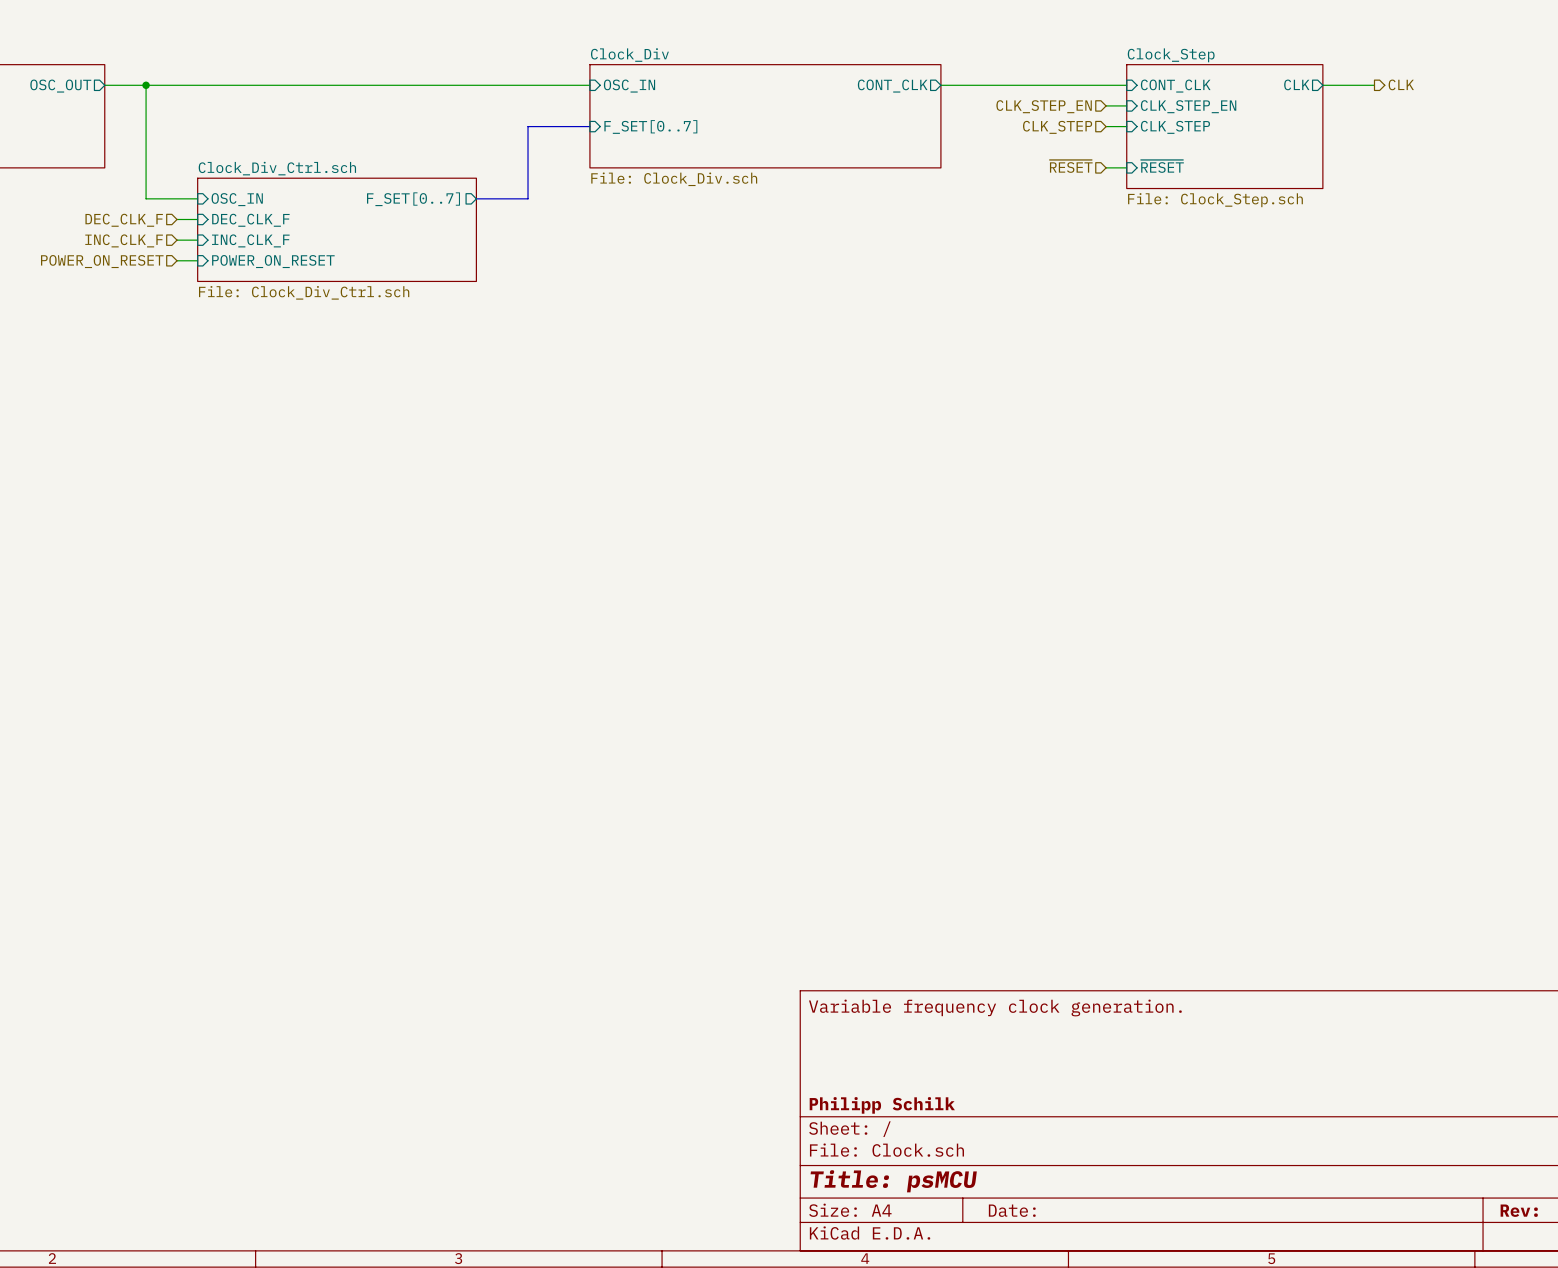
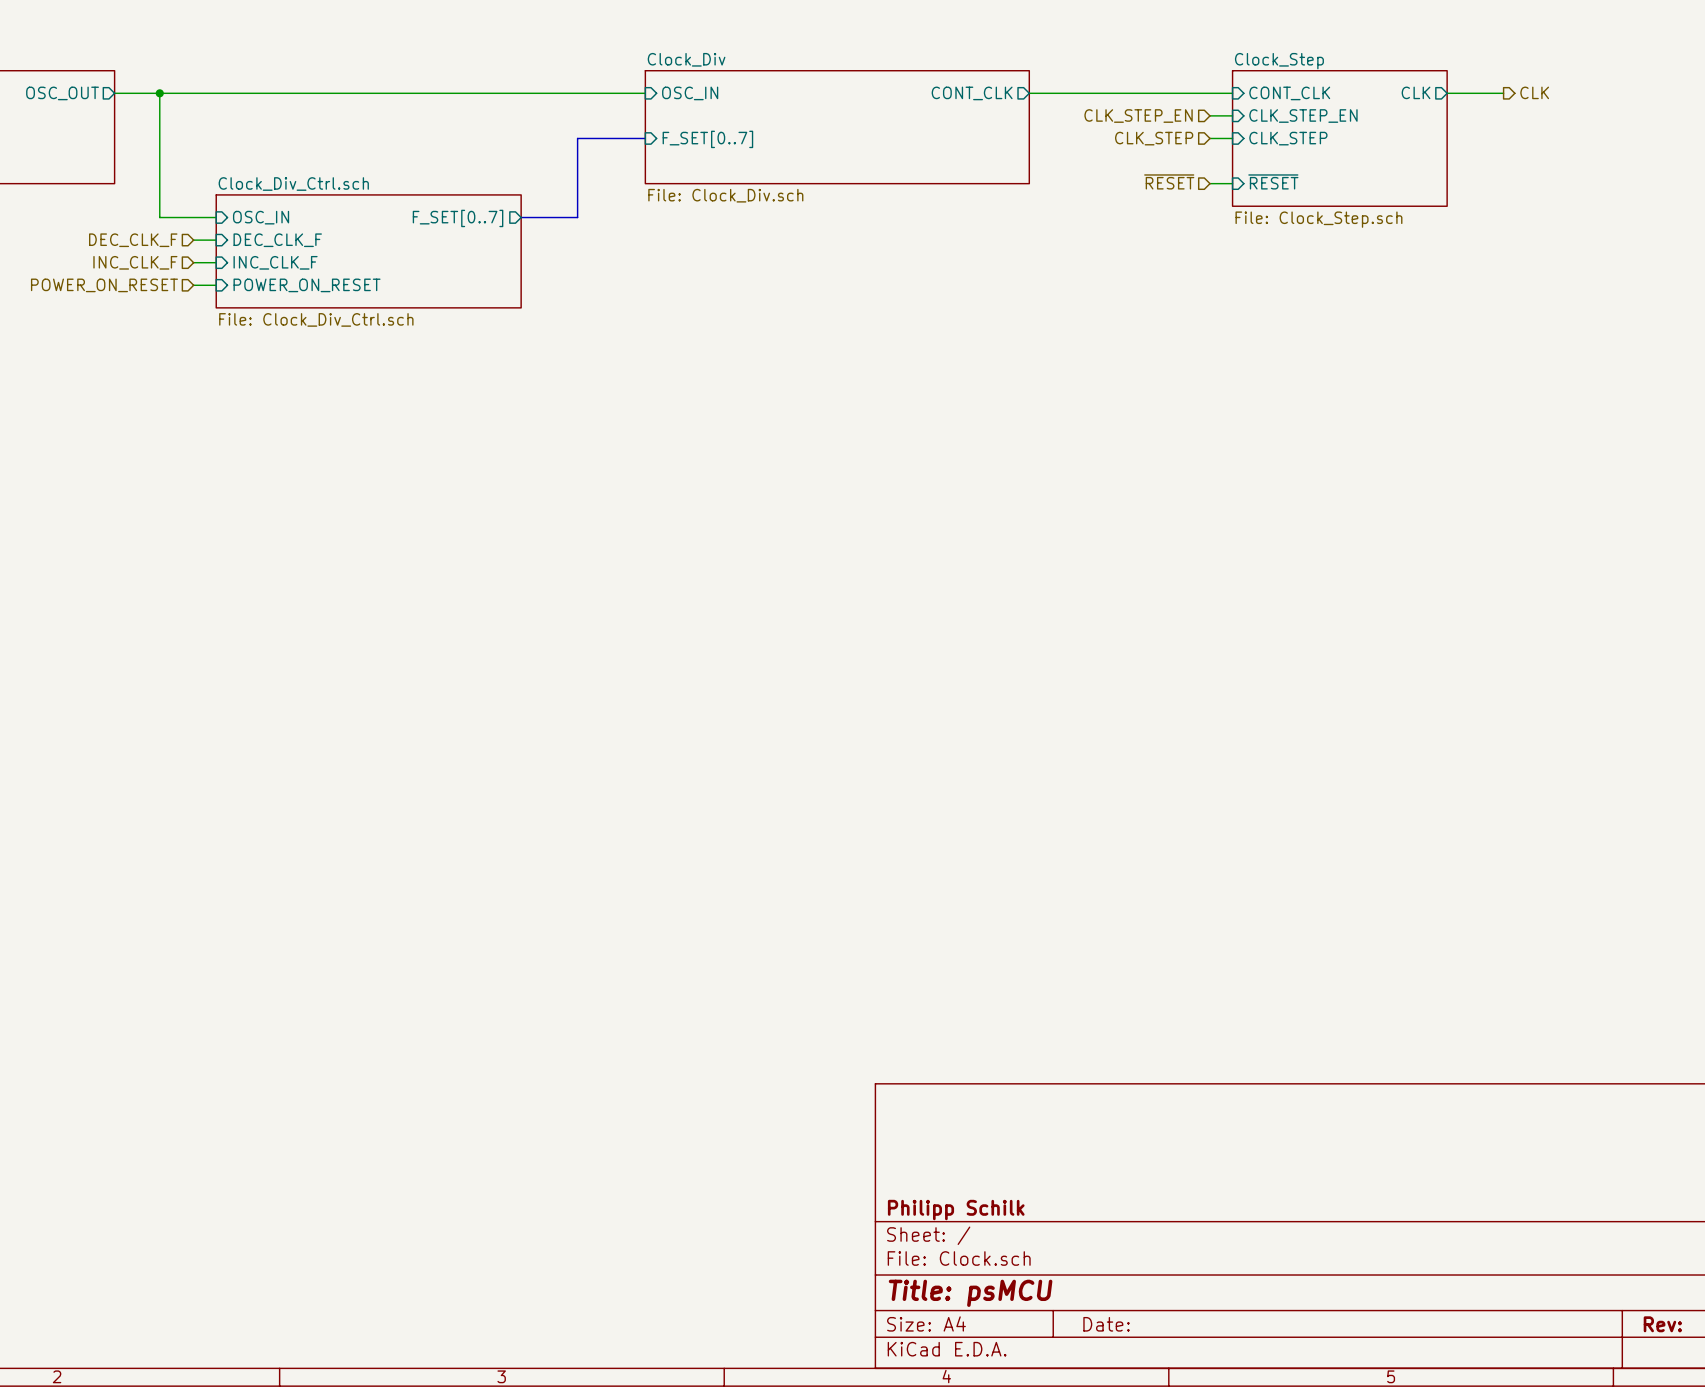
title block: Variable frequency clock generation. (995, 1007) -> none

